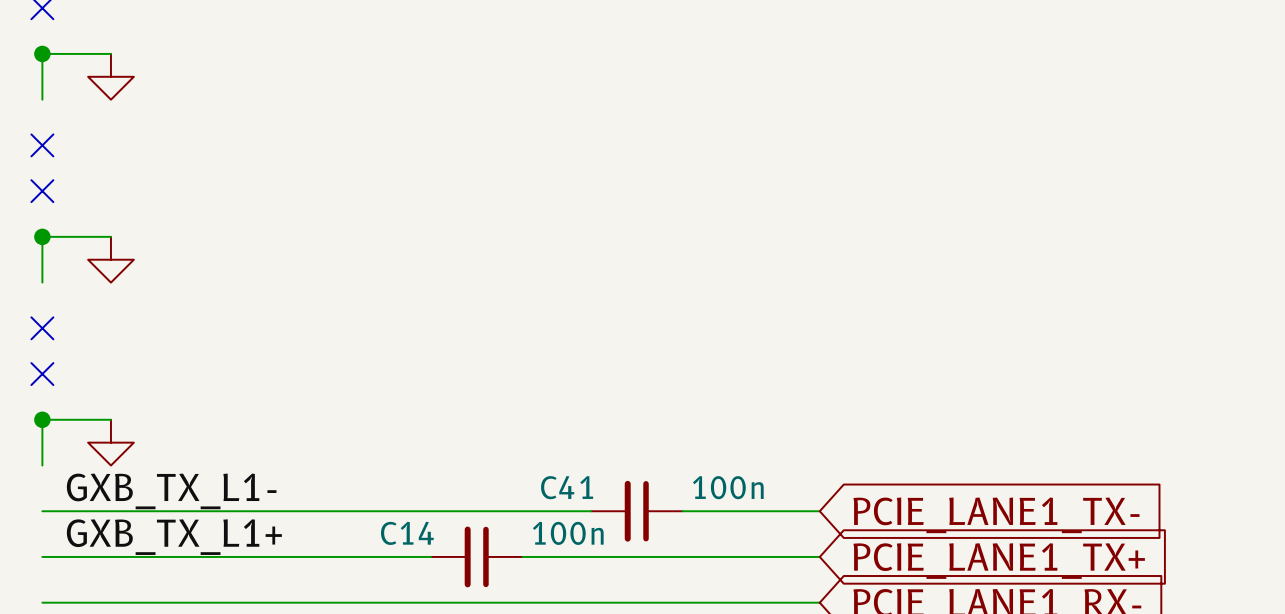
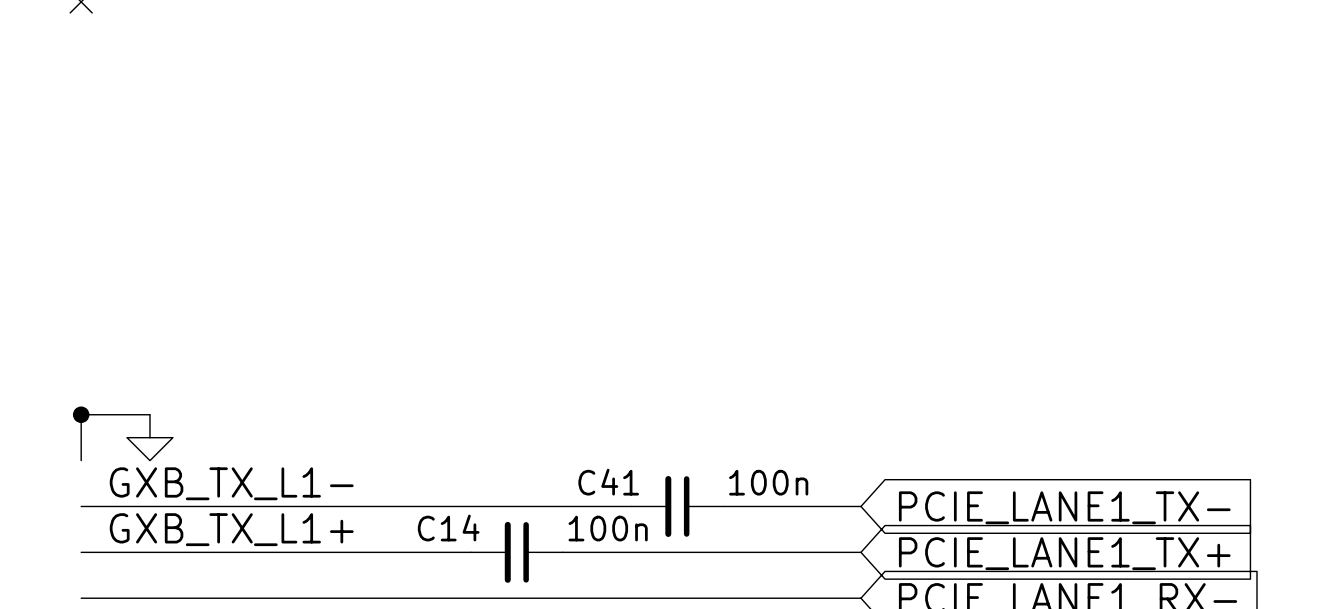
junction: (42, 53) -> none
wire: (110, 53) (42, 53) (42, 99) -> none
power symbol: (110, 76) -> none
no-connect mark: (42, 145) -> none
no-connect mark: (42, 191) -> none
junction: (42, 236) -> none
wire: (110, 236) (42, 236) (42, 282) -> none
power symbol: (110, 259) -> none
no-connect mark: (42, 328) -> none
no-connect mark: (42, 374) -> none

